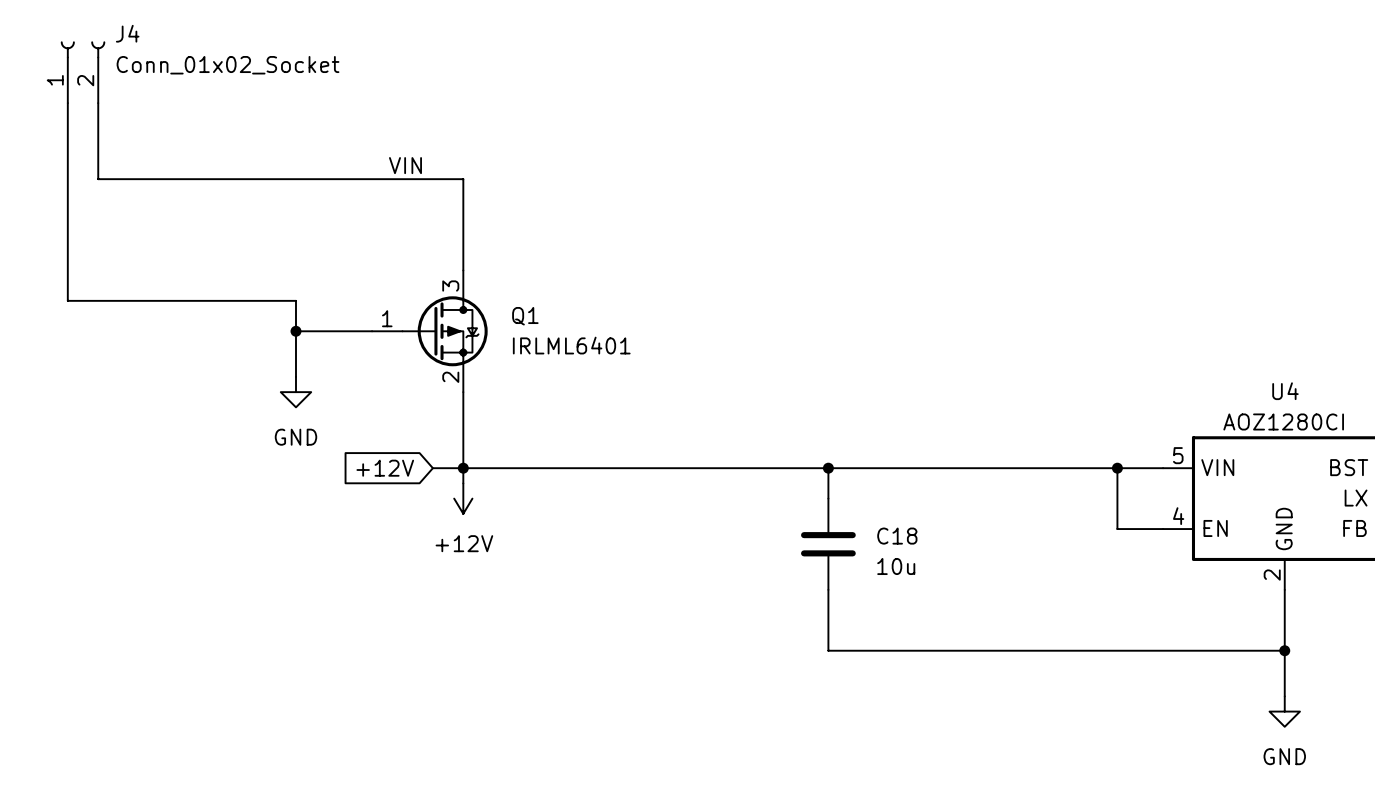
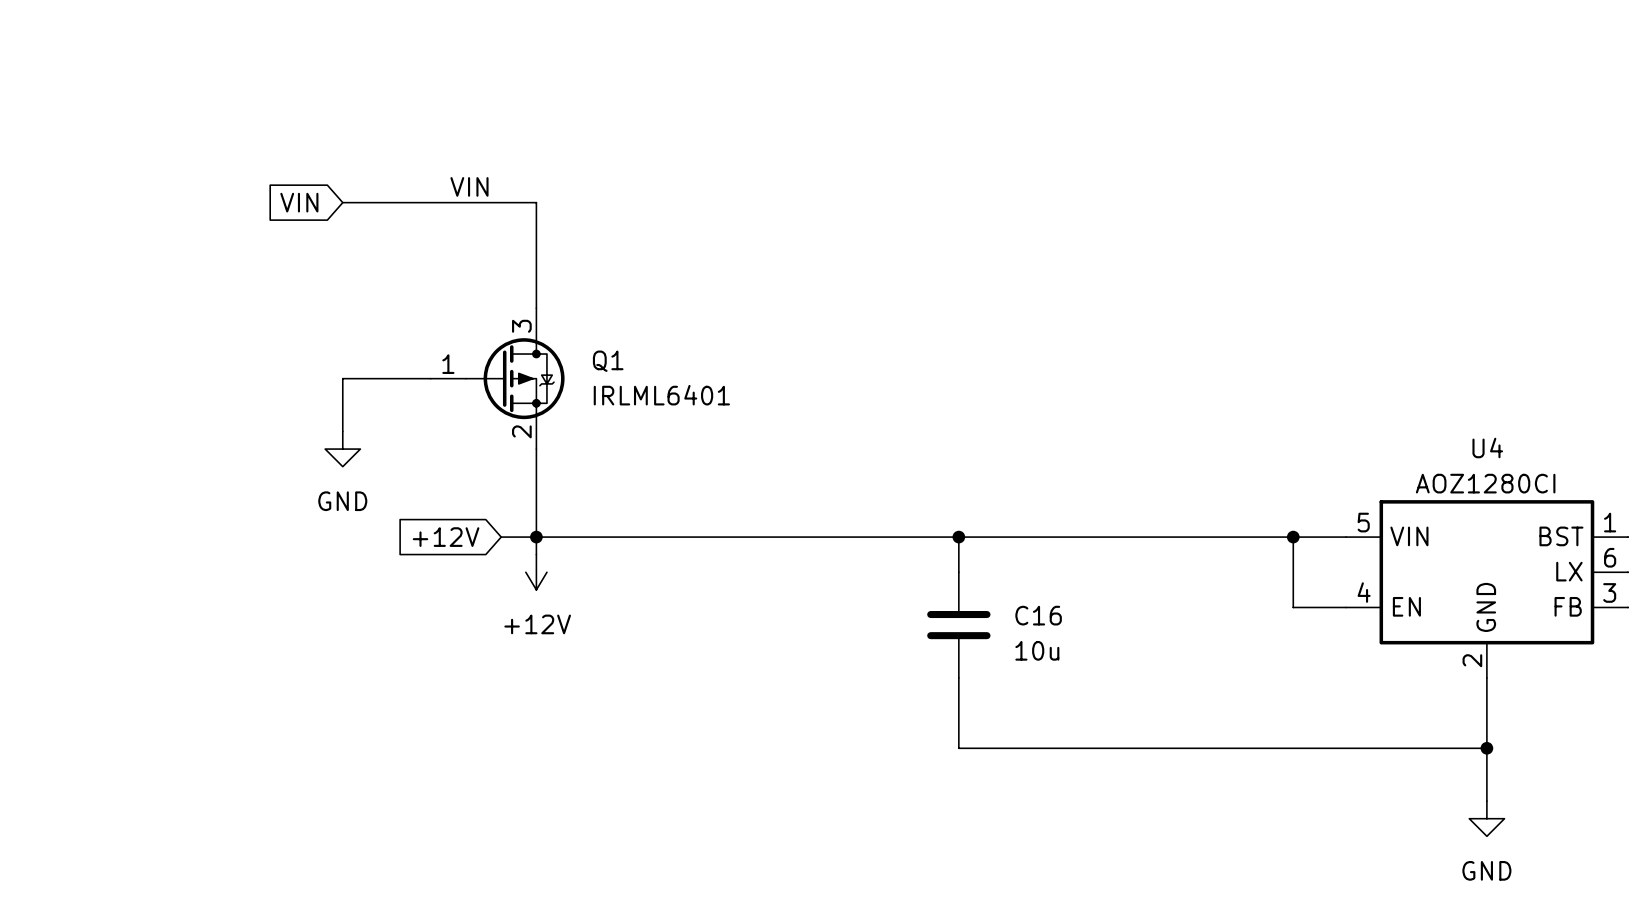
J4: Conn_01x02_Socket (83, 72) -> none
wire: (67, 103) (67, 300) (295, 300) (295, 331) -> none
wire: (98, 103) (98, 179) (295, 179) -> none
global label: none -> VIN (299, 202)
junction: (295, 331) -> none
C18 name: C18 (897, 536) -> C16 (1038, 615)

